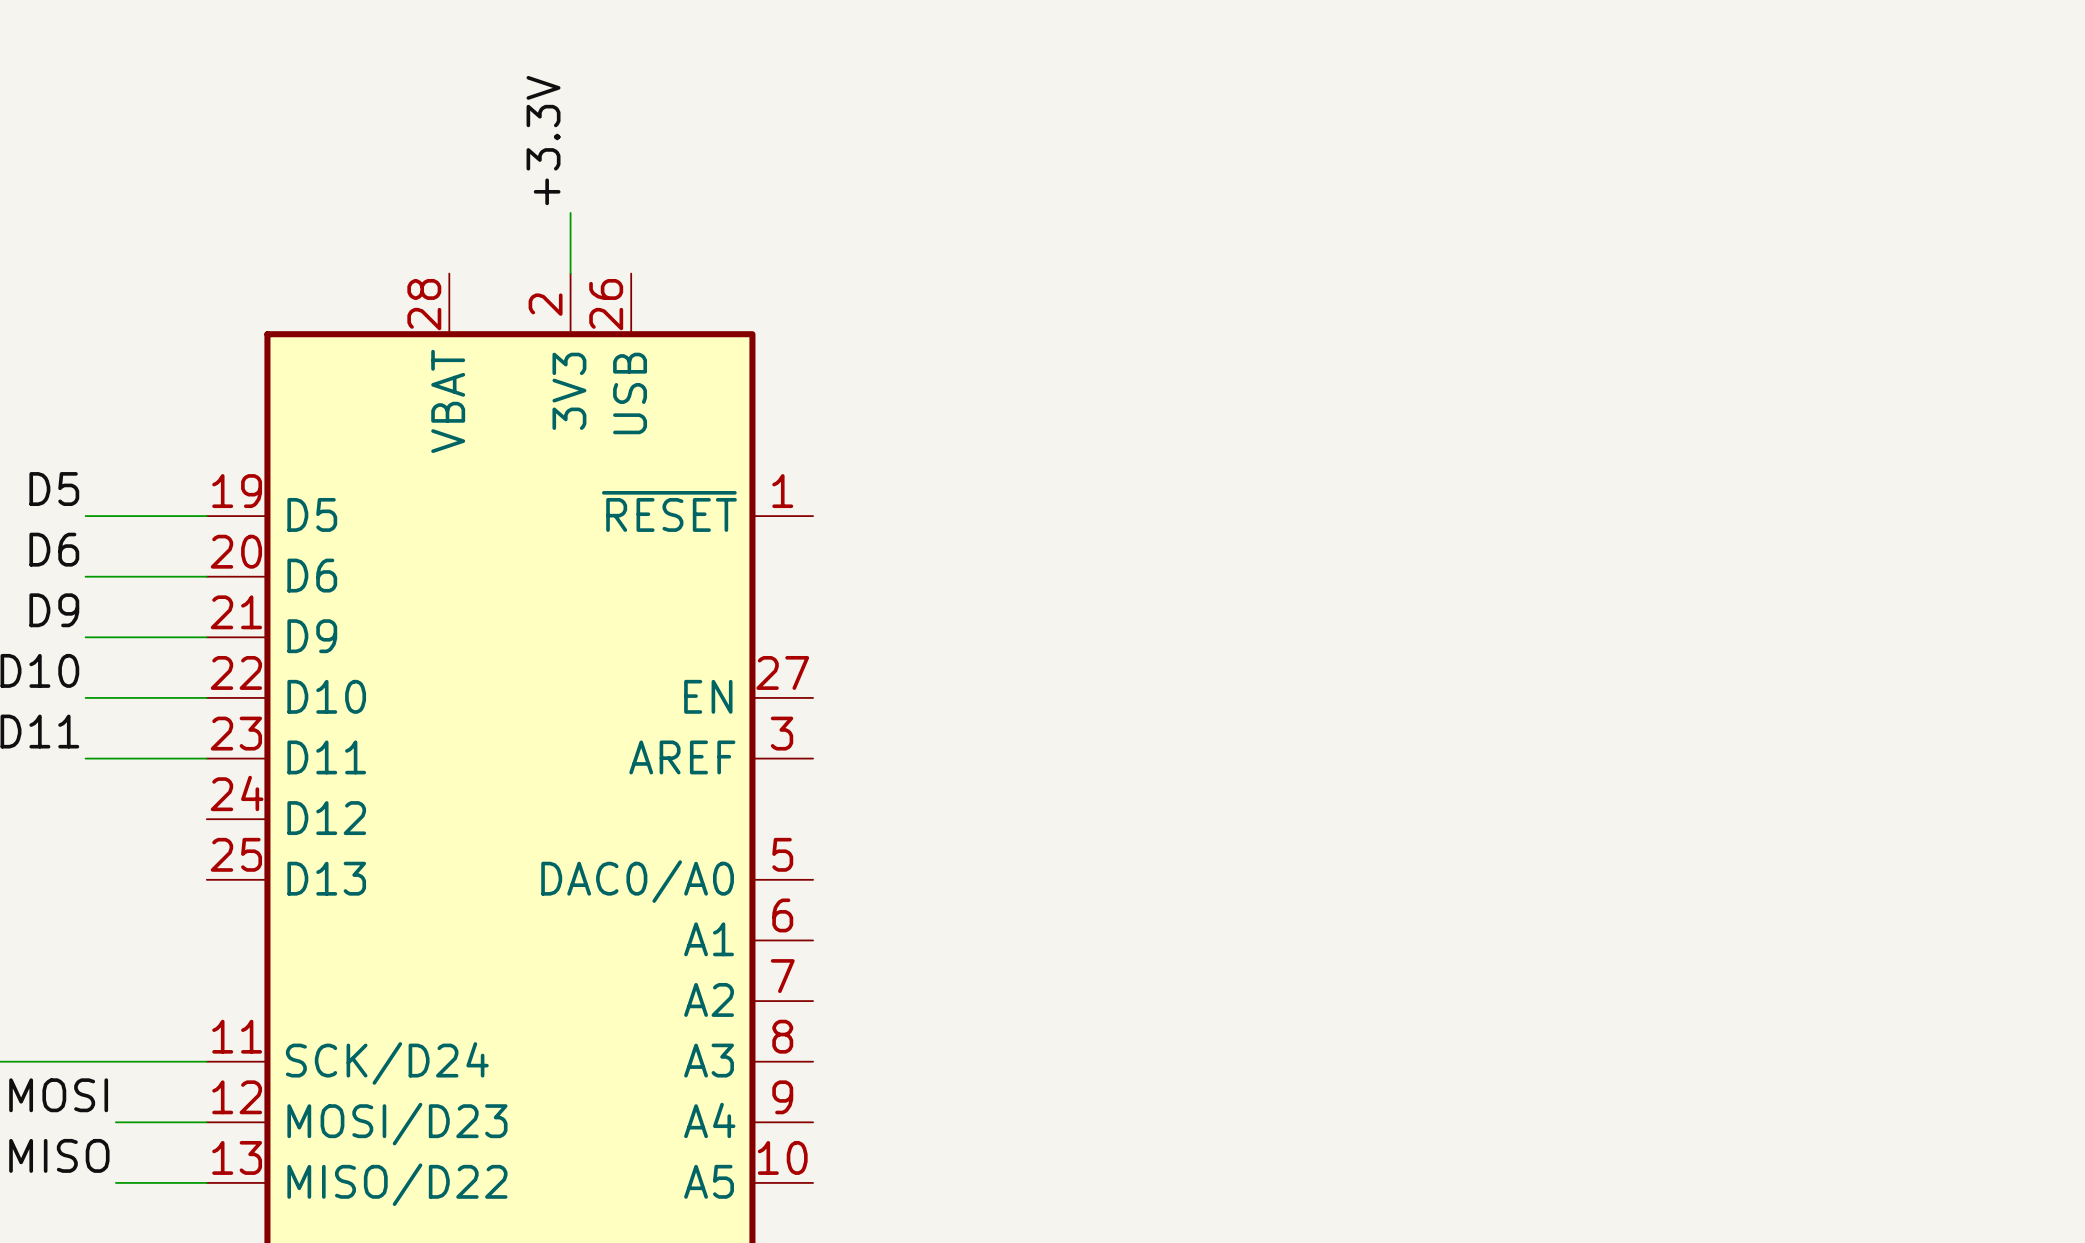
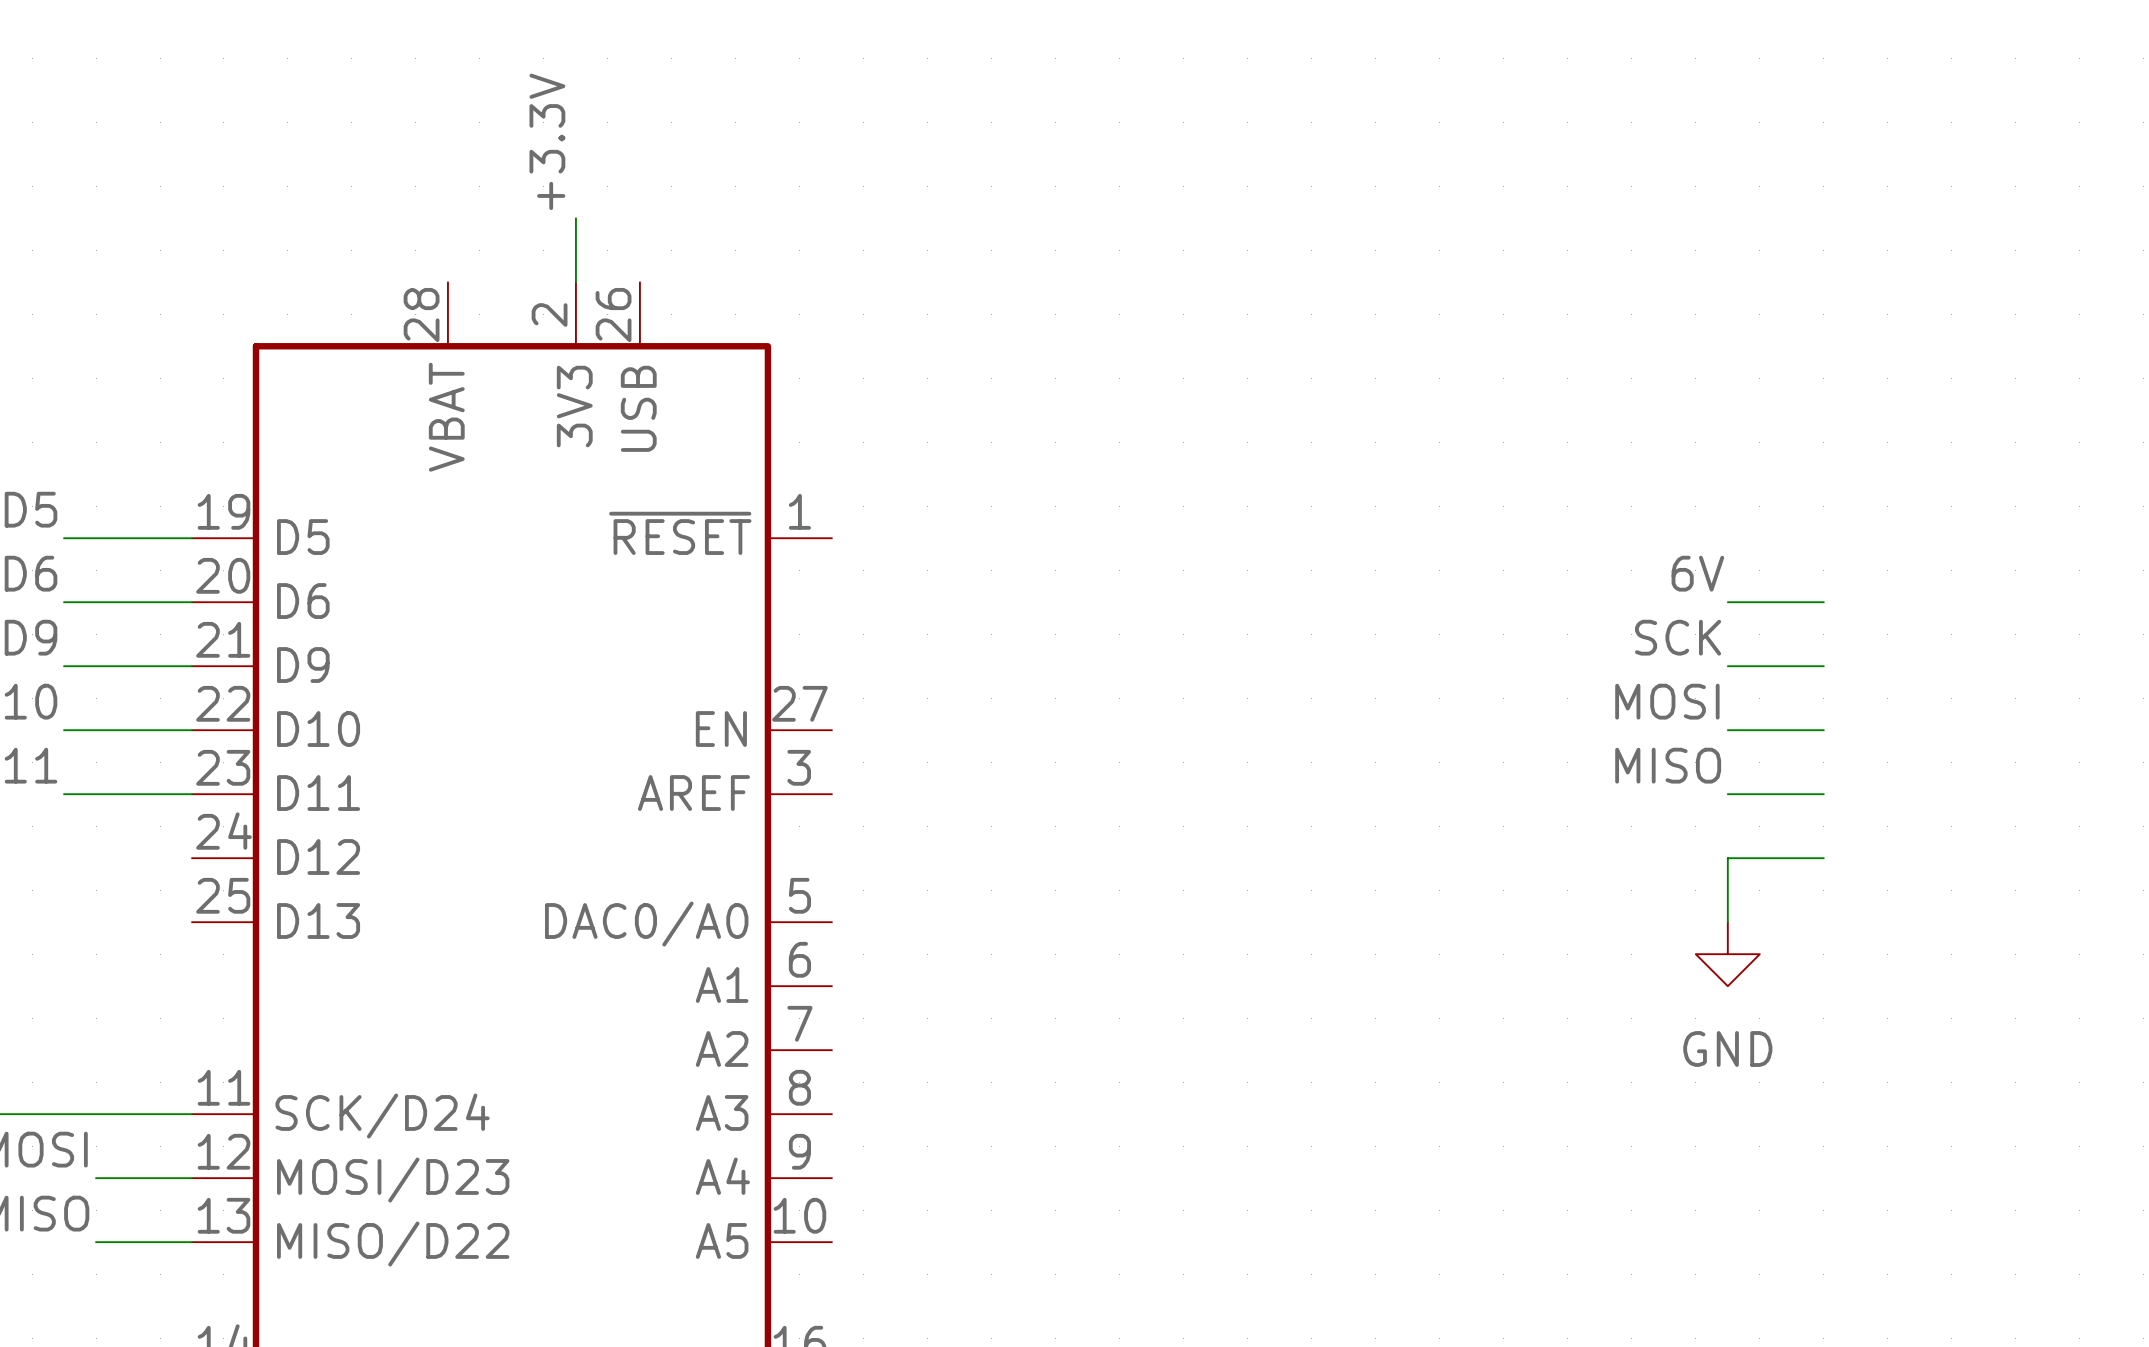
label: none -> 6V (1697, 573)
wire: none -> (1727, 602) (1823, 602)
label: none -> SCK (1678, 637)
wire: none -> (1727, 666) (1823, 666)
label: none -> MOSI (1667, 701)
wire: none -> (1727, 730) (1823, 730)
label: none -> MISO (1668, 765)
wire: none -> (1727, 794) (1823, 794)
wire: none -> (1823, 858) (1727, 858) (1727, 922)
power symbol: none -> GND (1727, 954)

